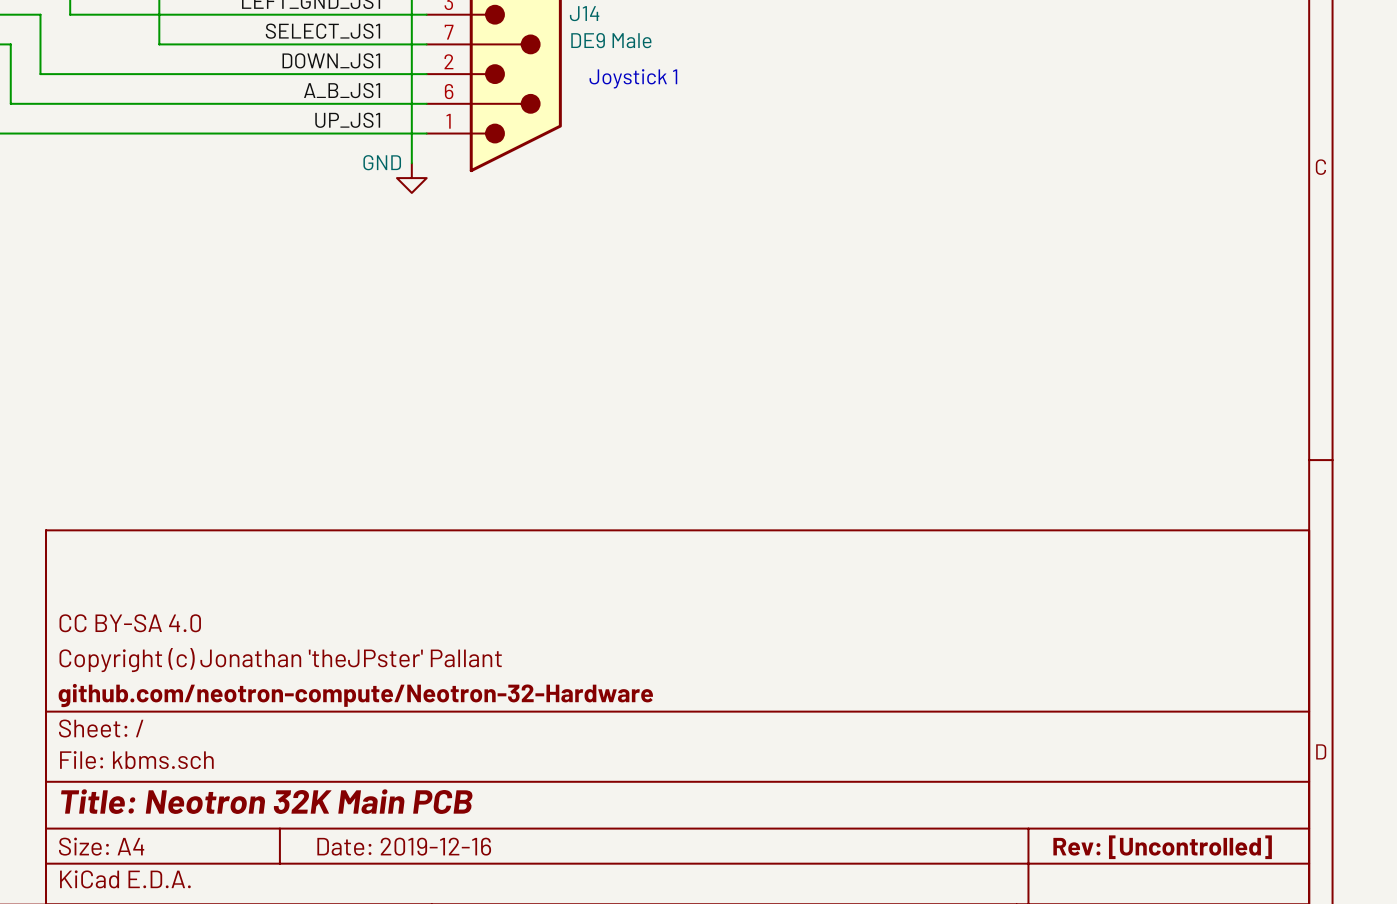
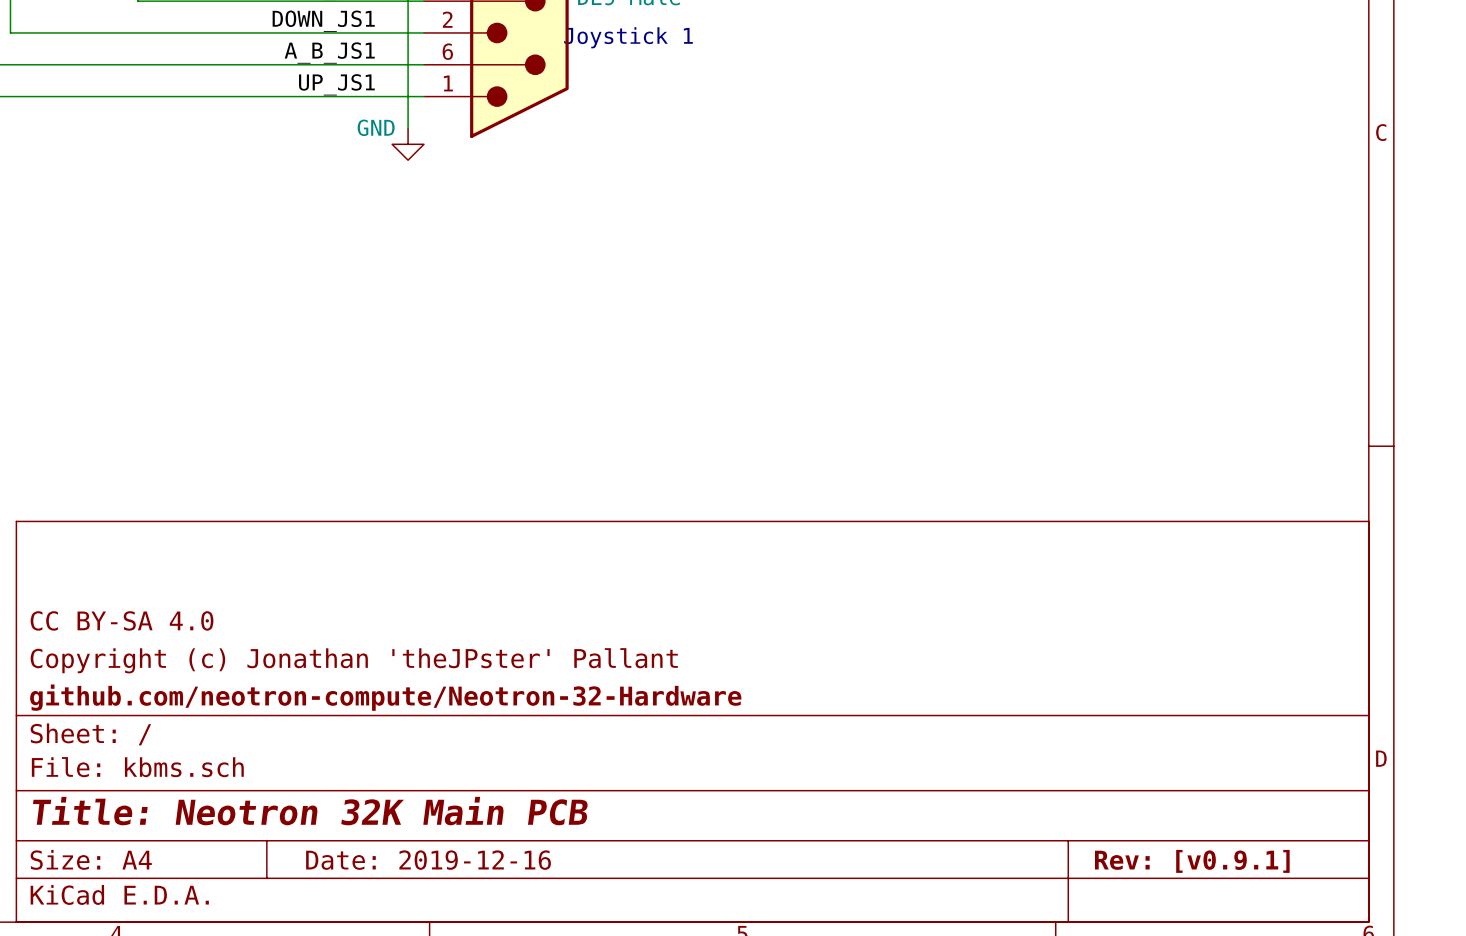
title block: Rev: [Uncontrolled] (1162, 847) -> Rev: [v0.9.1] (1192, 861)

